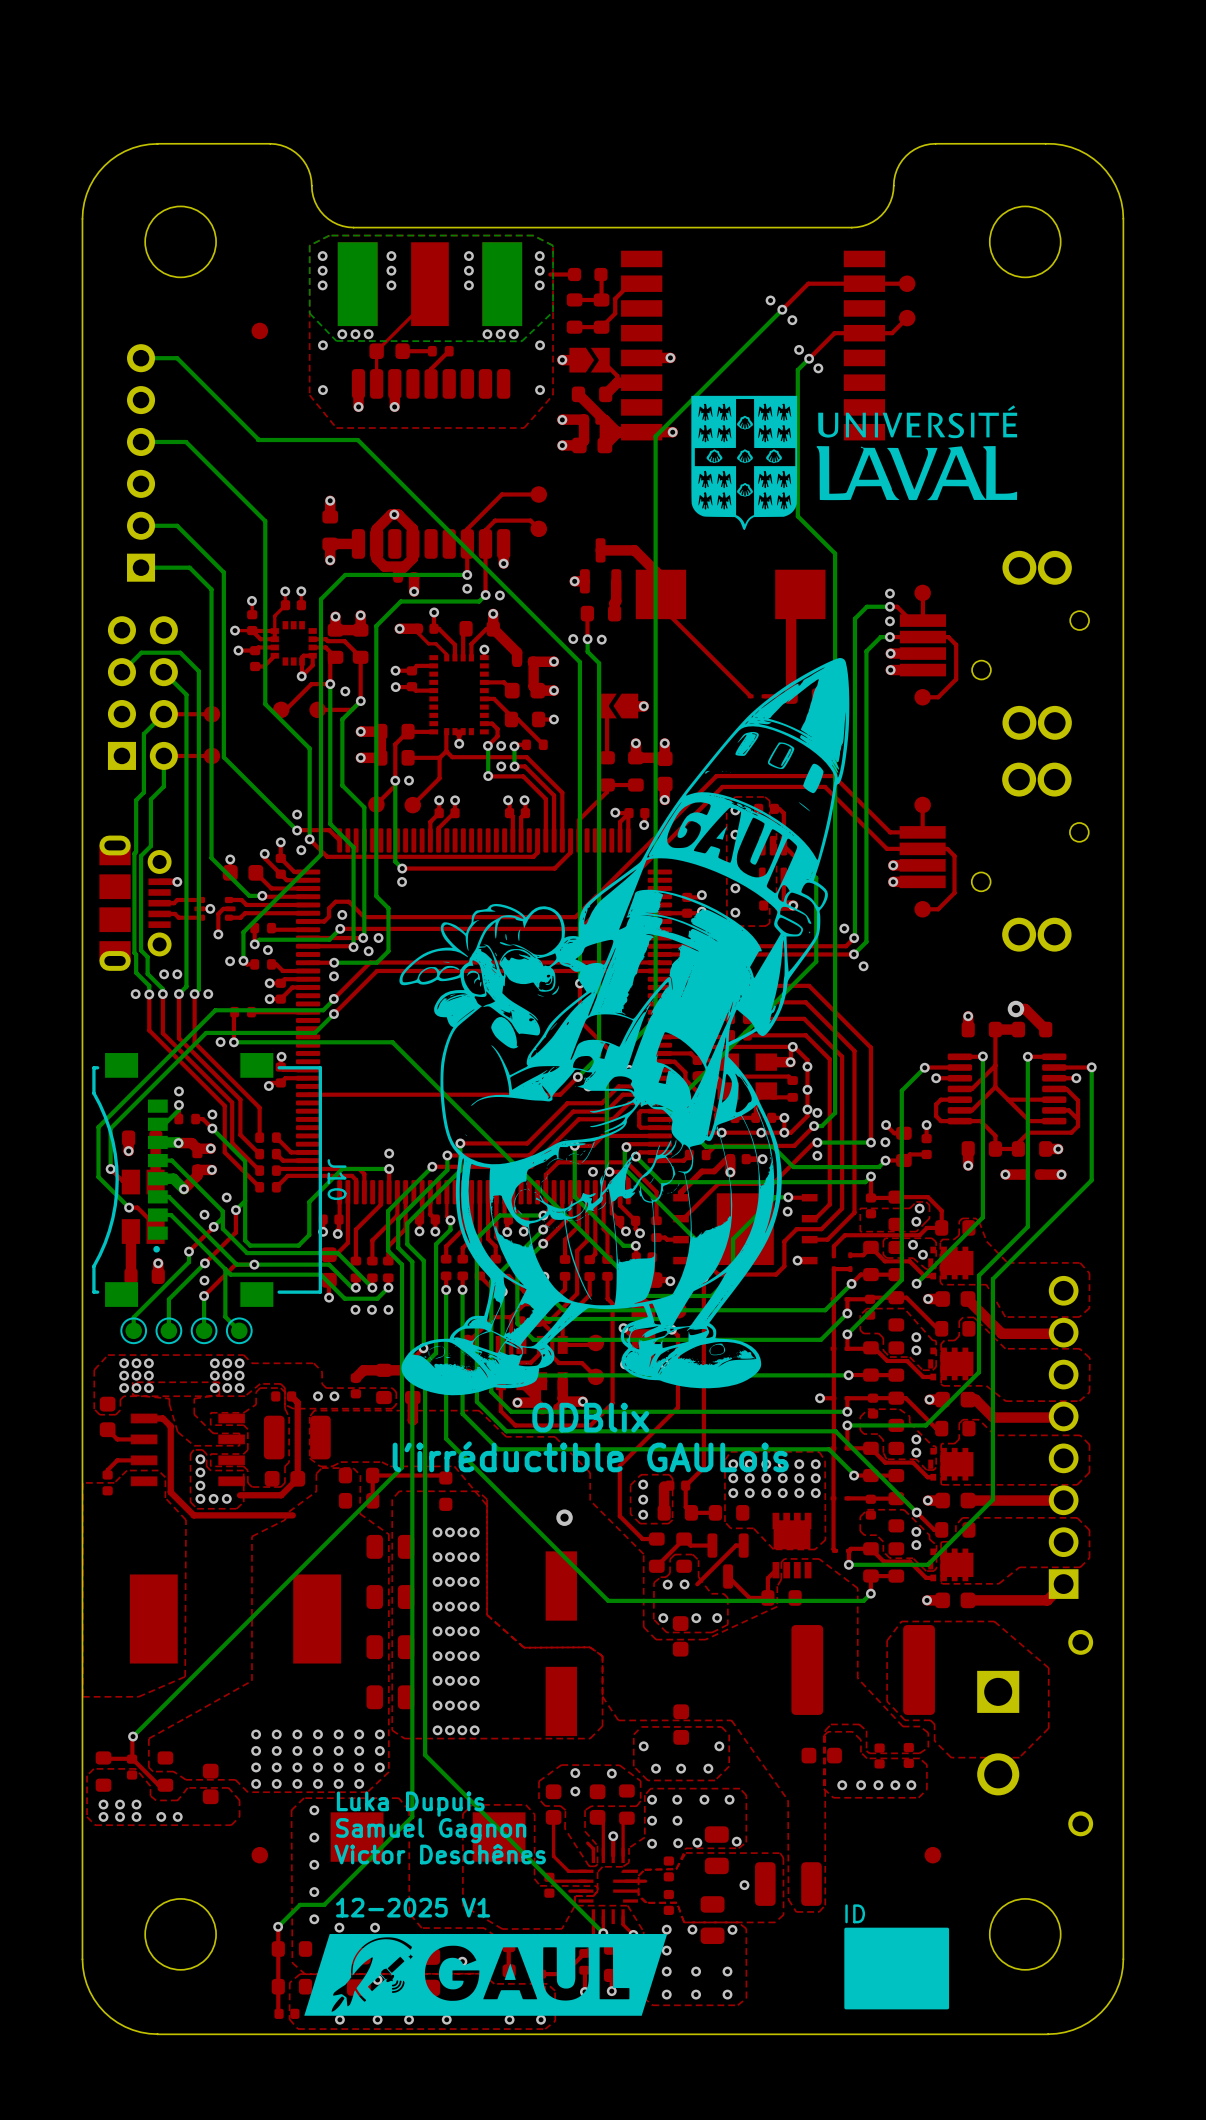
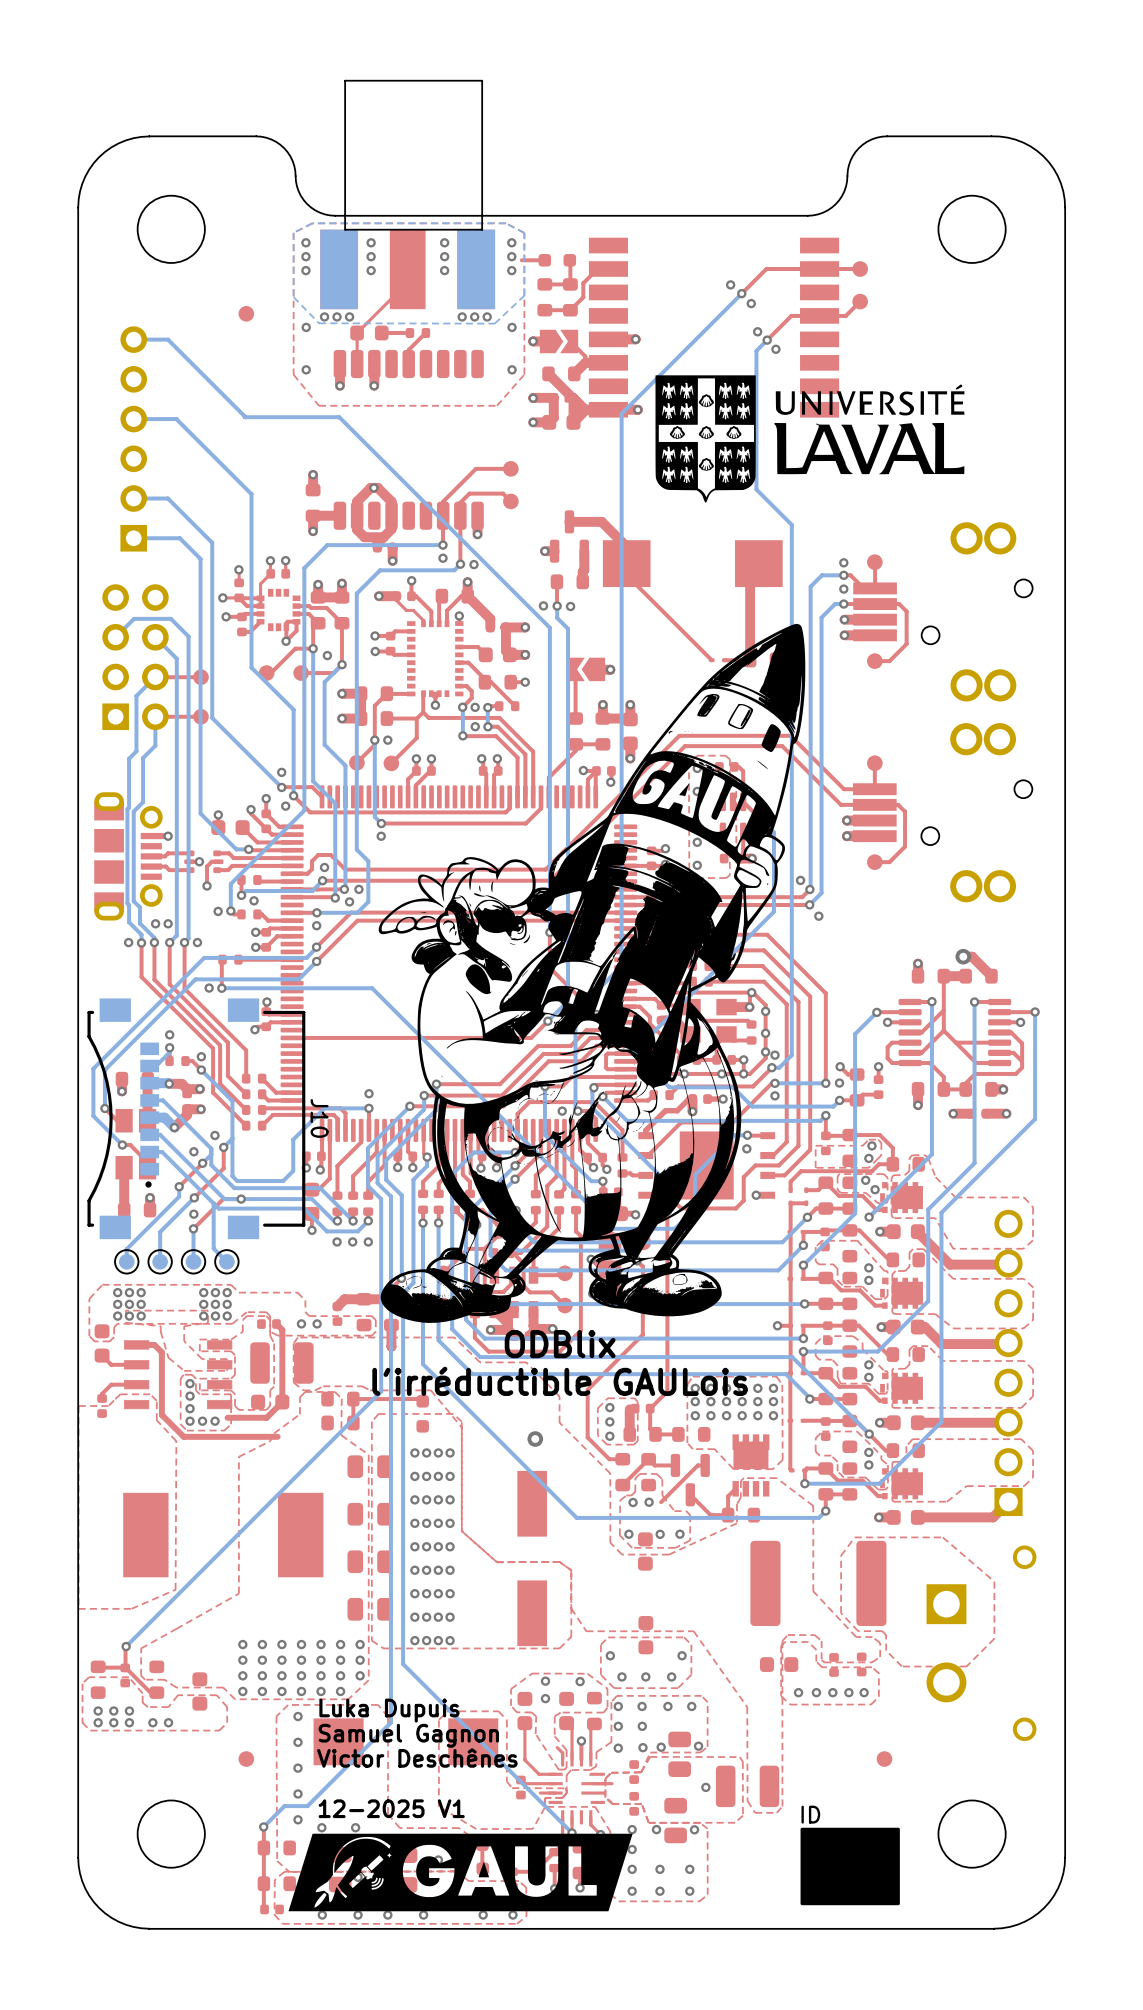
part: none -> (407, 194)
part: (429, 284) -> none

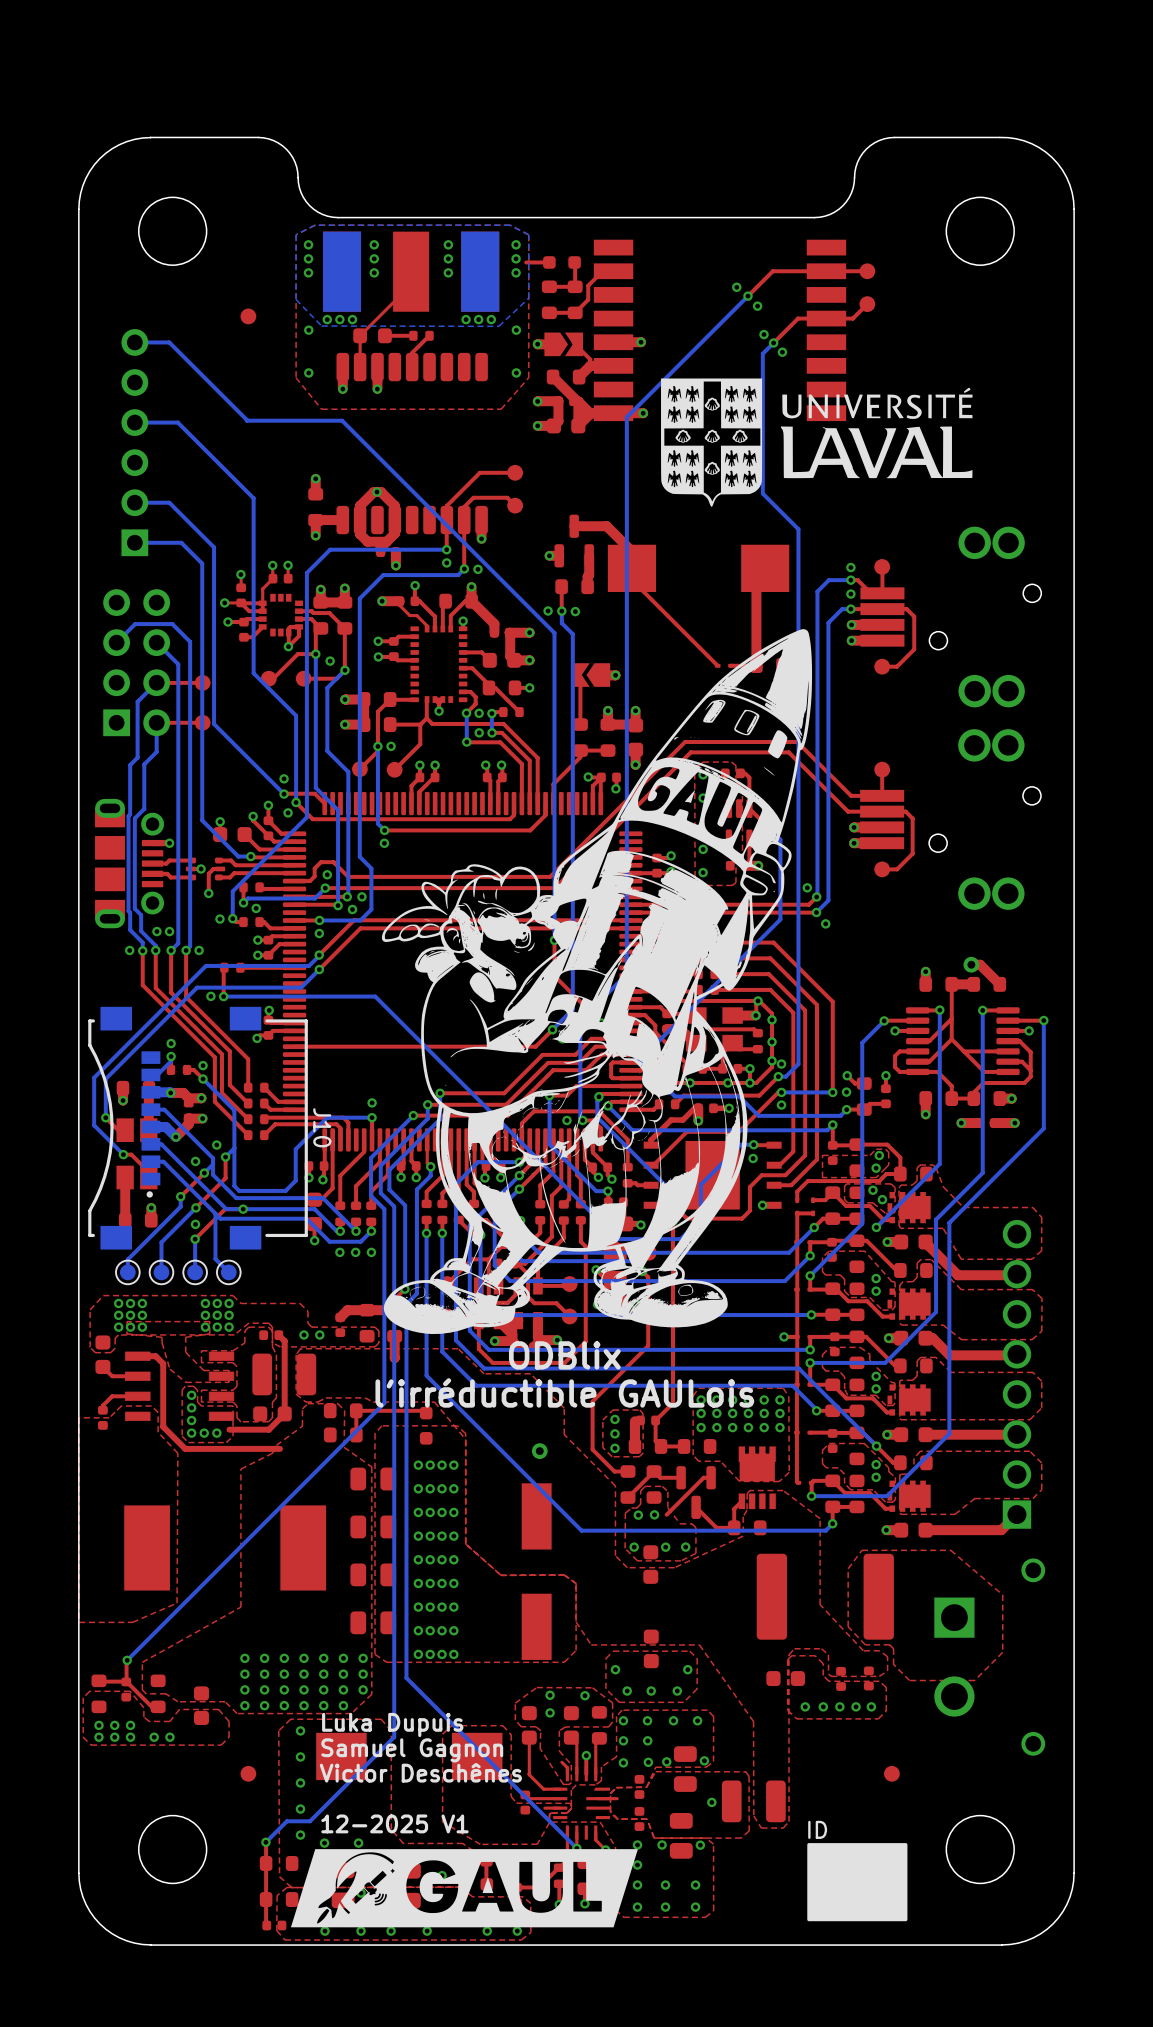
part: (407, 194) -> none
part: none -> (411, 271)

